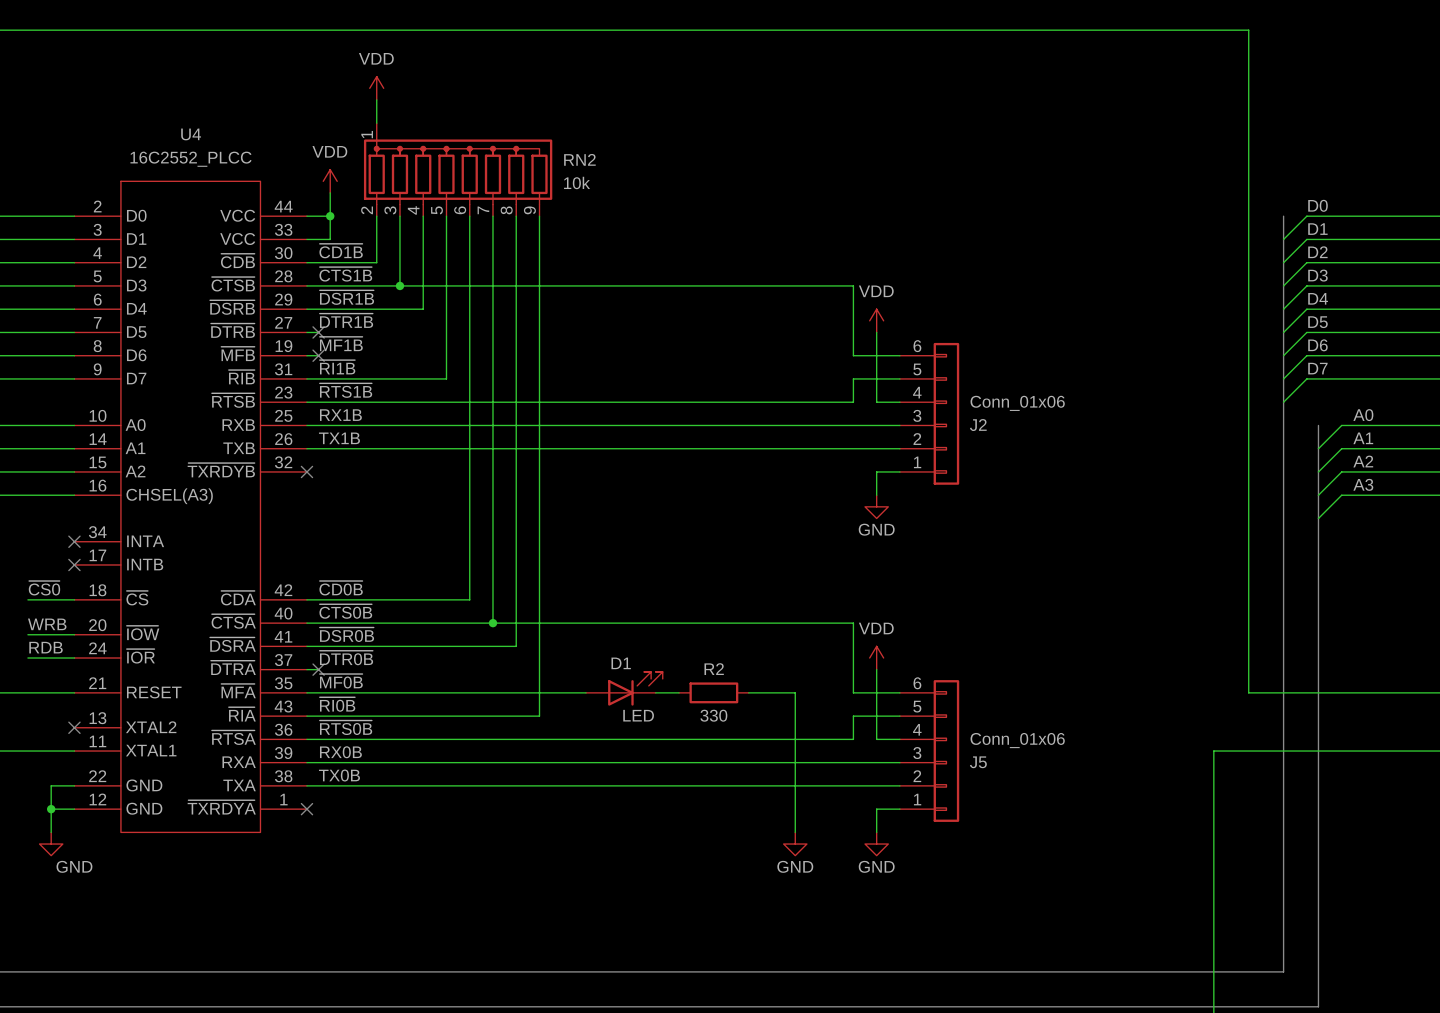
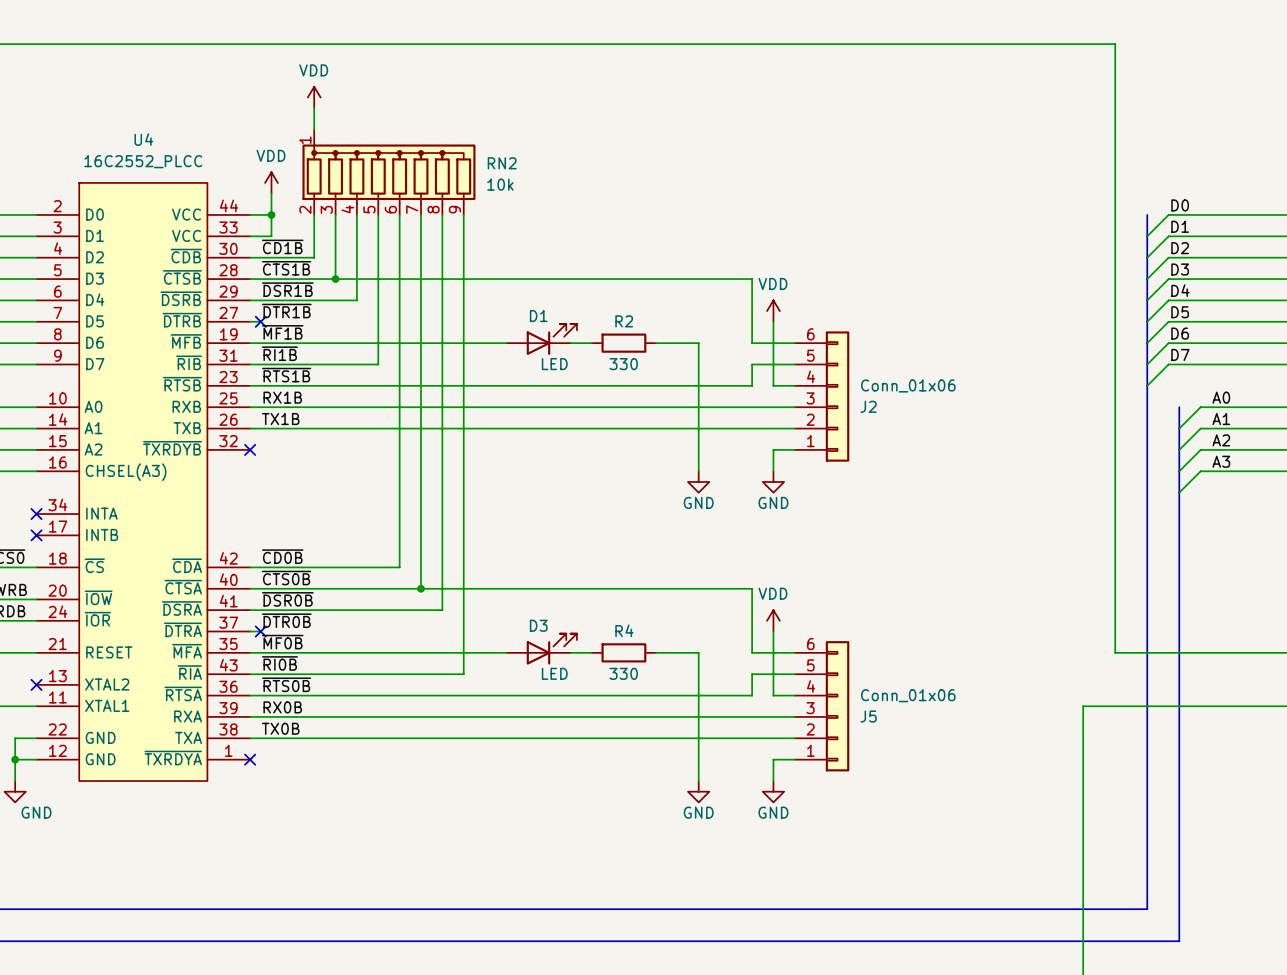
D1: none -> LED (541, 339)
wire: none -> (260, 343) (506, 343)
no-connect mark: (318, 355) -> none
wire: none -> (570, 343) (591, 343)
R2: none -> 330 (623, 343)
wire: none -> (655, 343) (698, 343) (698, 471)
power symbol: none -> GND (698, 481)
D1 name: D1 (621, 663) -> D3 (538, 625)
R2 name: R2 (714, 669) -> R4 (624, 630)

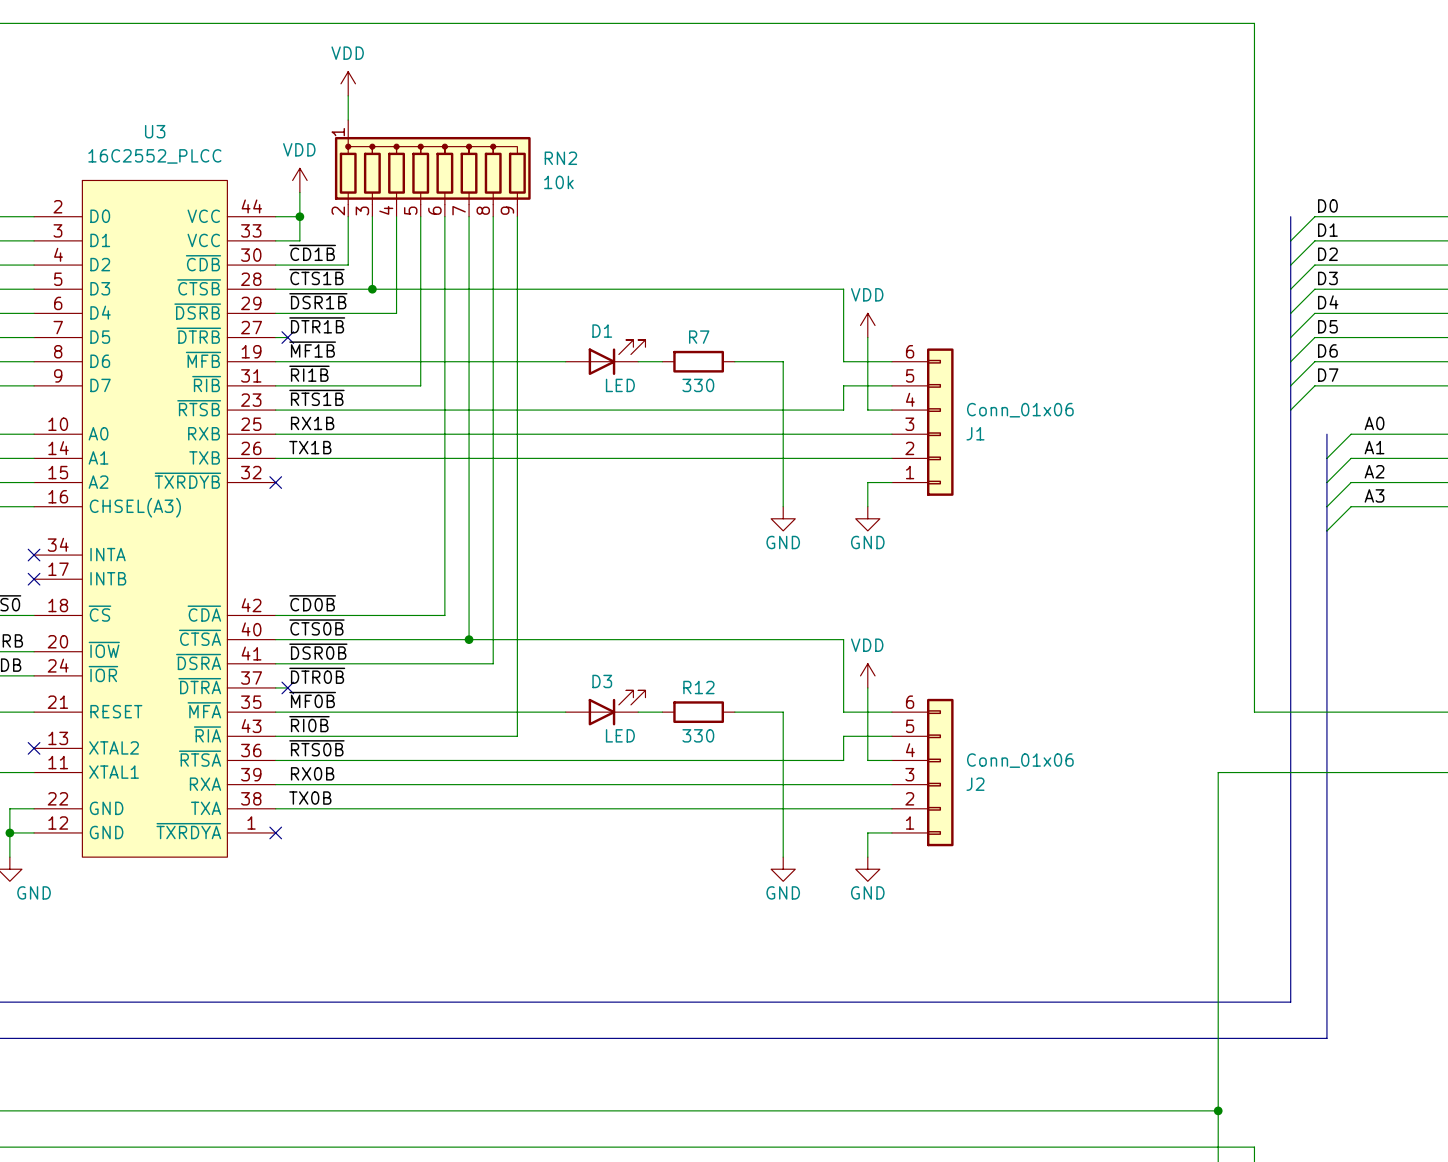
U4 name: U4 (143, 139) -> U3 (155, 131)
R2 name: R2 (624, 321) -> R7 (699, 337)
J2 name: J2 (868, 406) -> J1 (975, 433)
R4 name: R4 (624, 630) -> R12 (698, 687)
J5 name: J5 (868, 716) -> J2 (975, 784)

